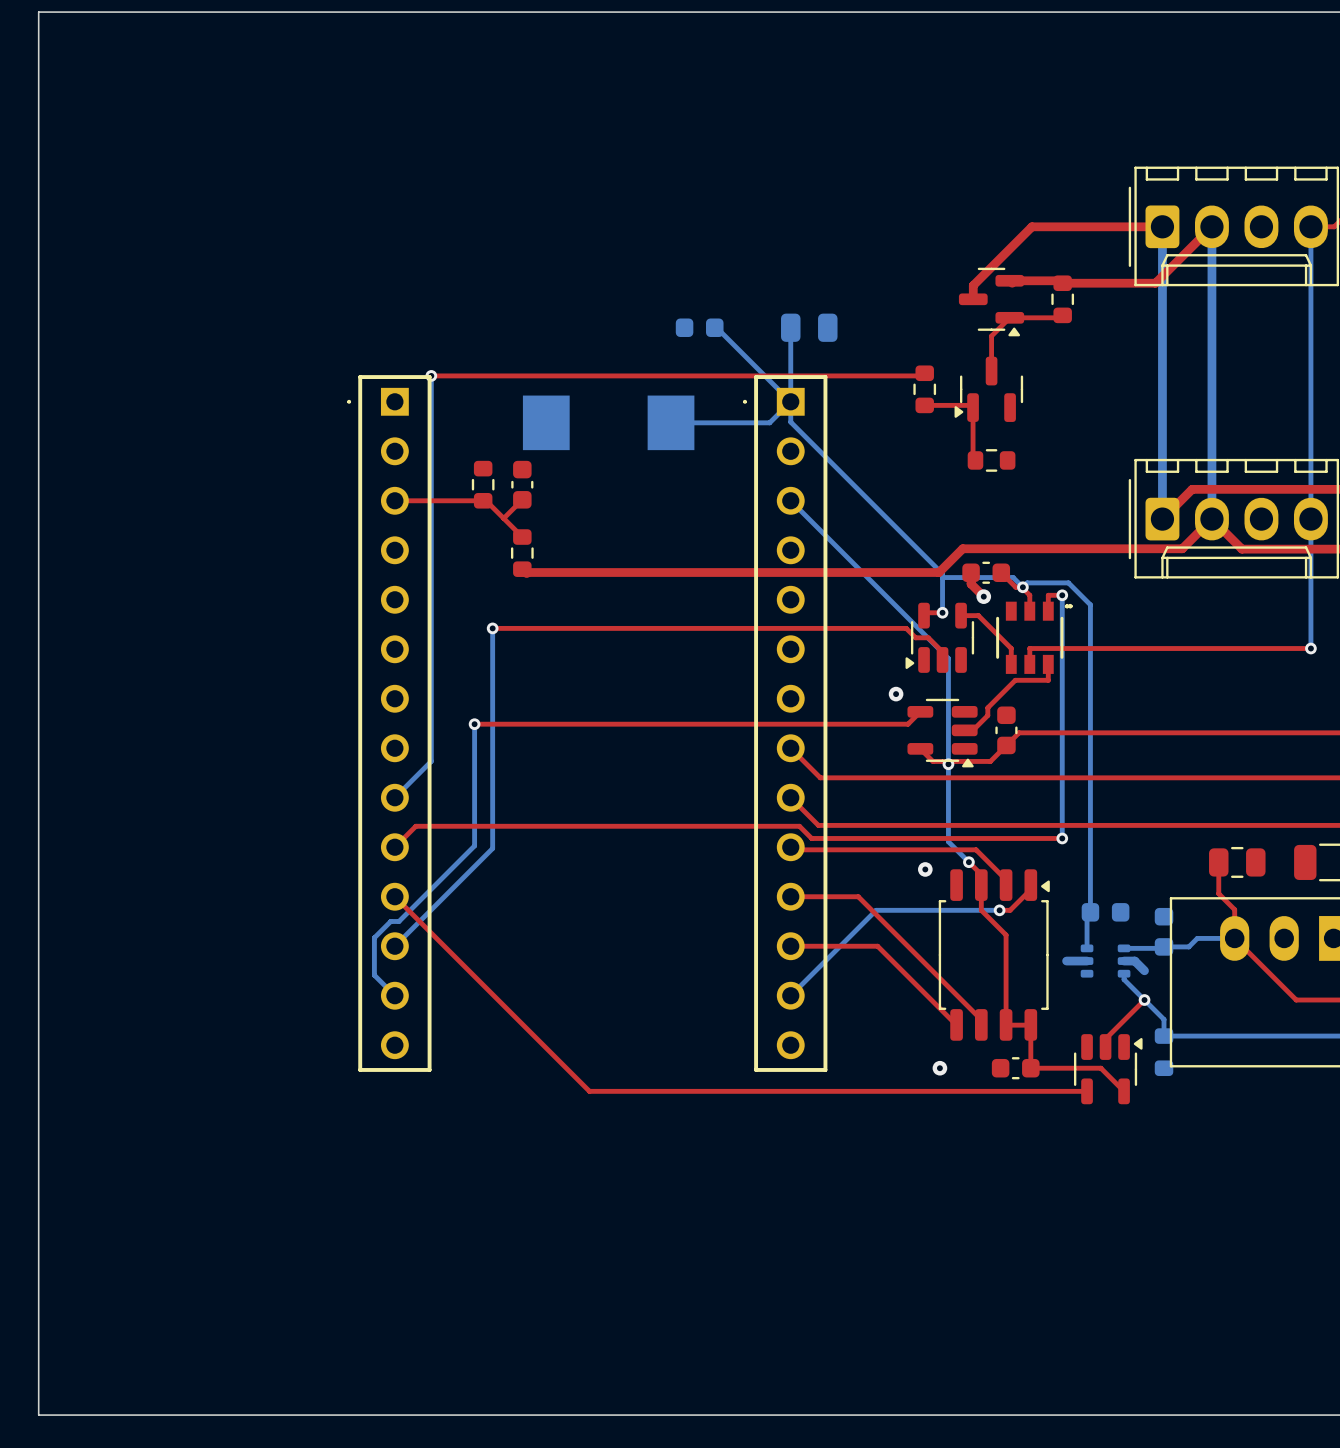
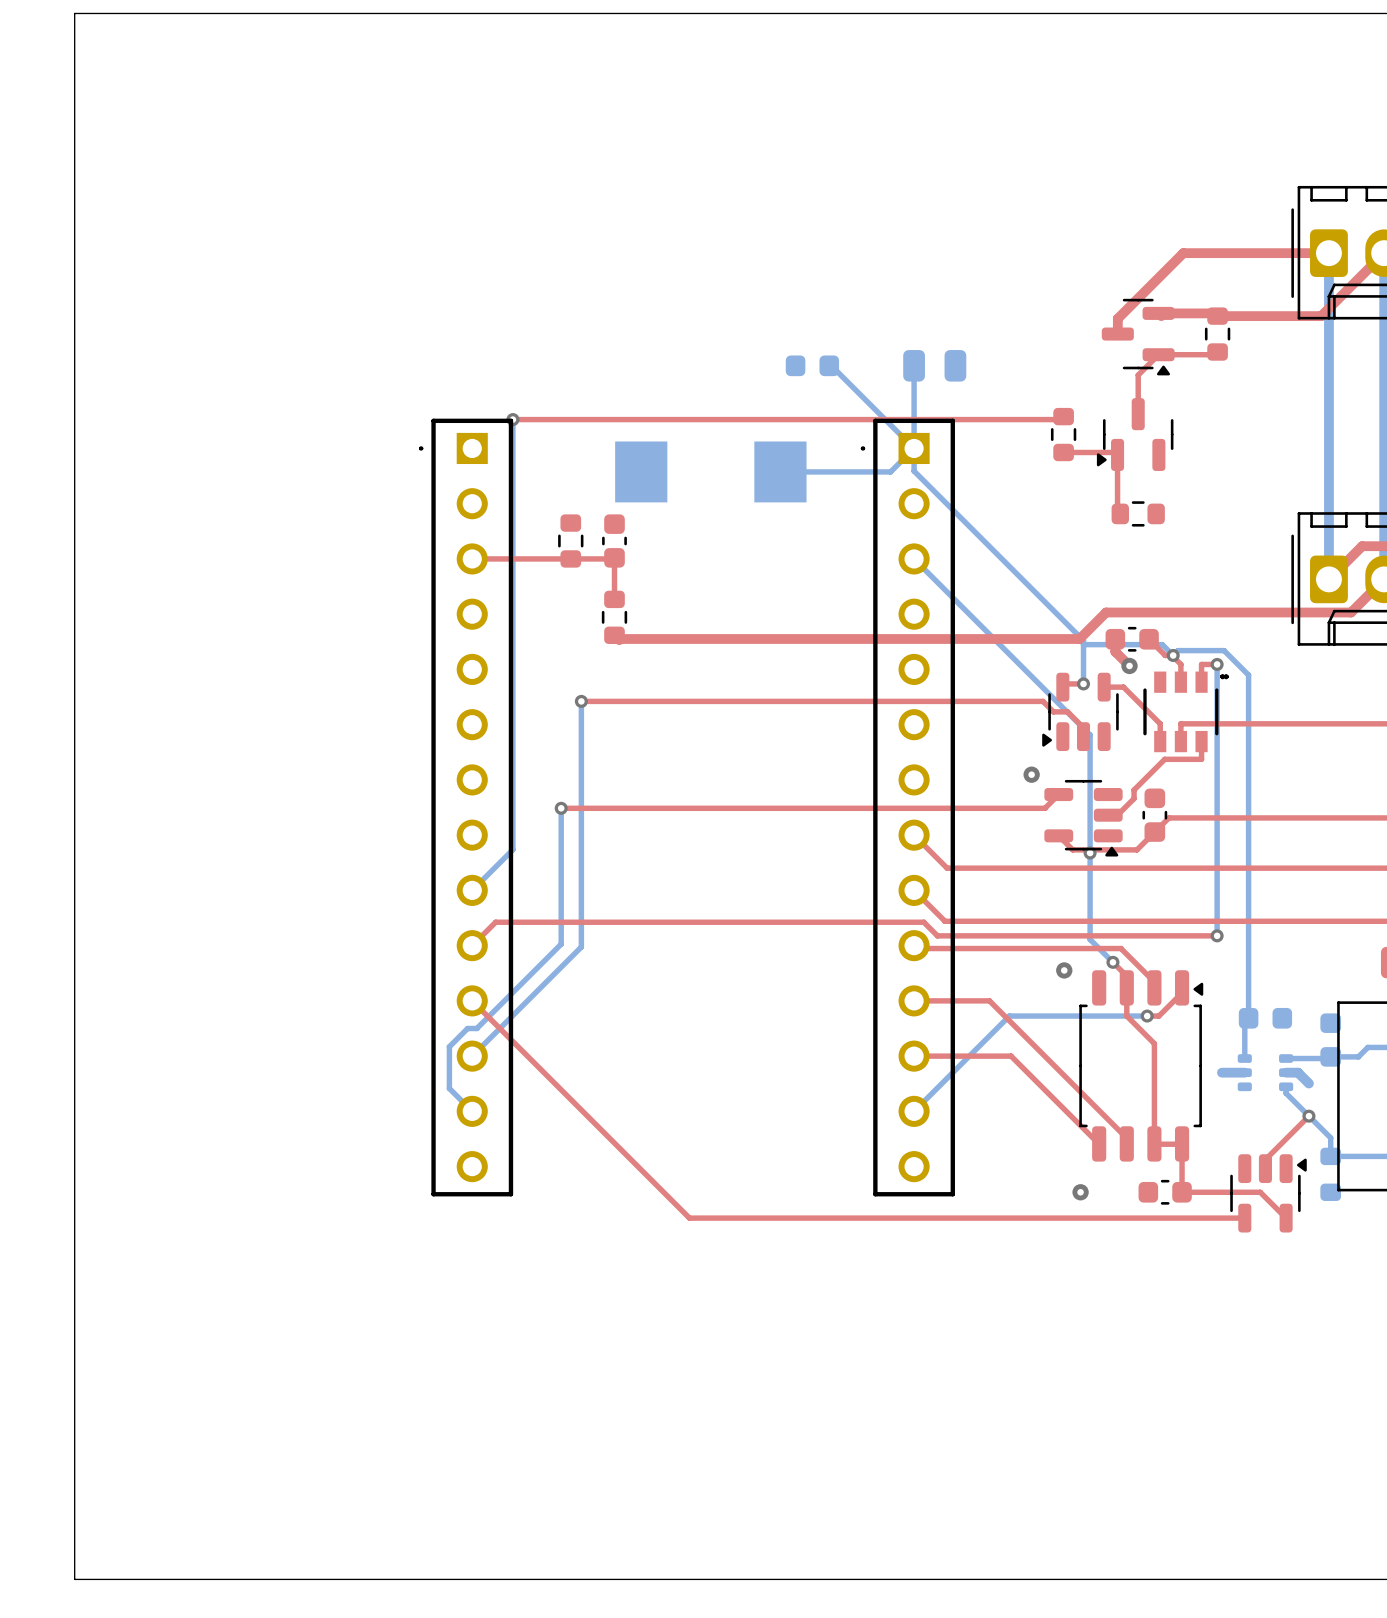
top track: none -> (613, 557) (614, 599)
top track: (522, 499) (503, 518) -> none
top track: (486, 500) (522, 537) -> (574, 558) (614, 560)

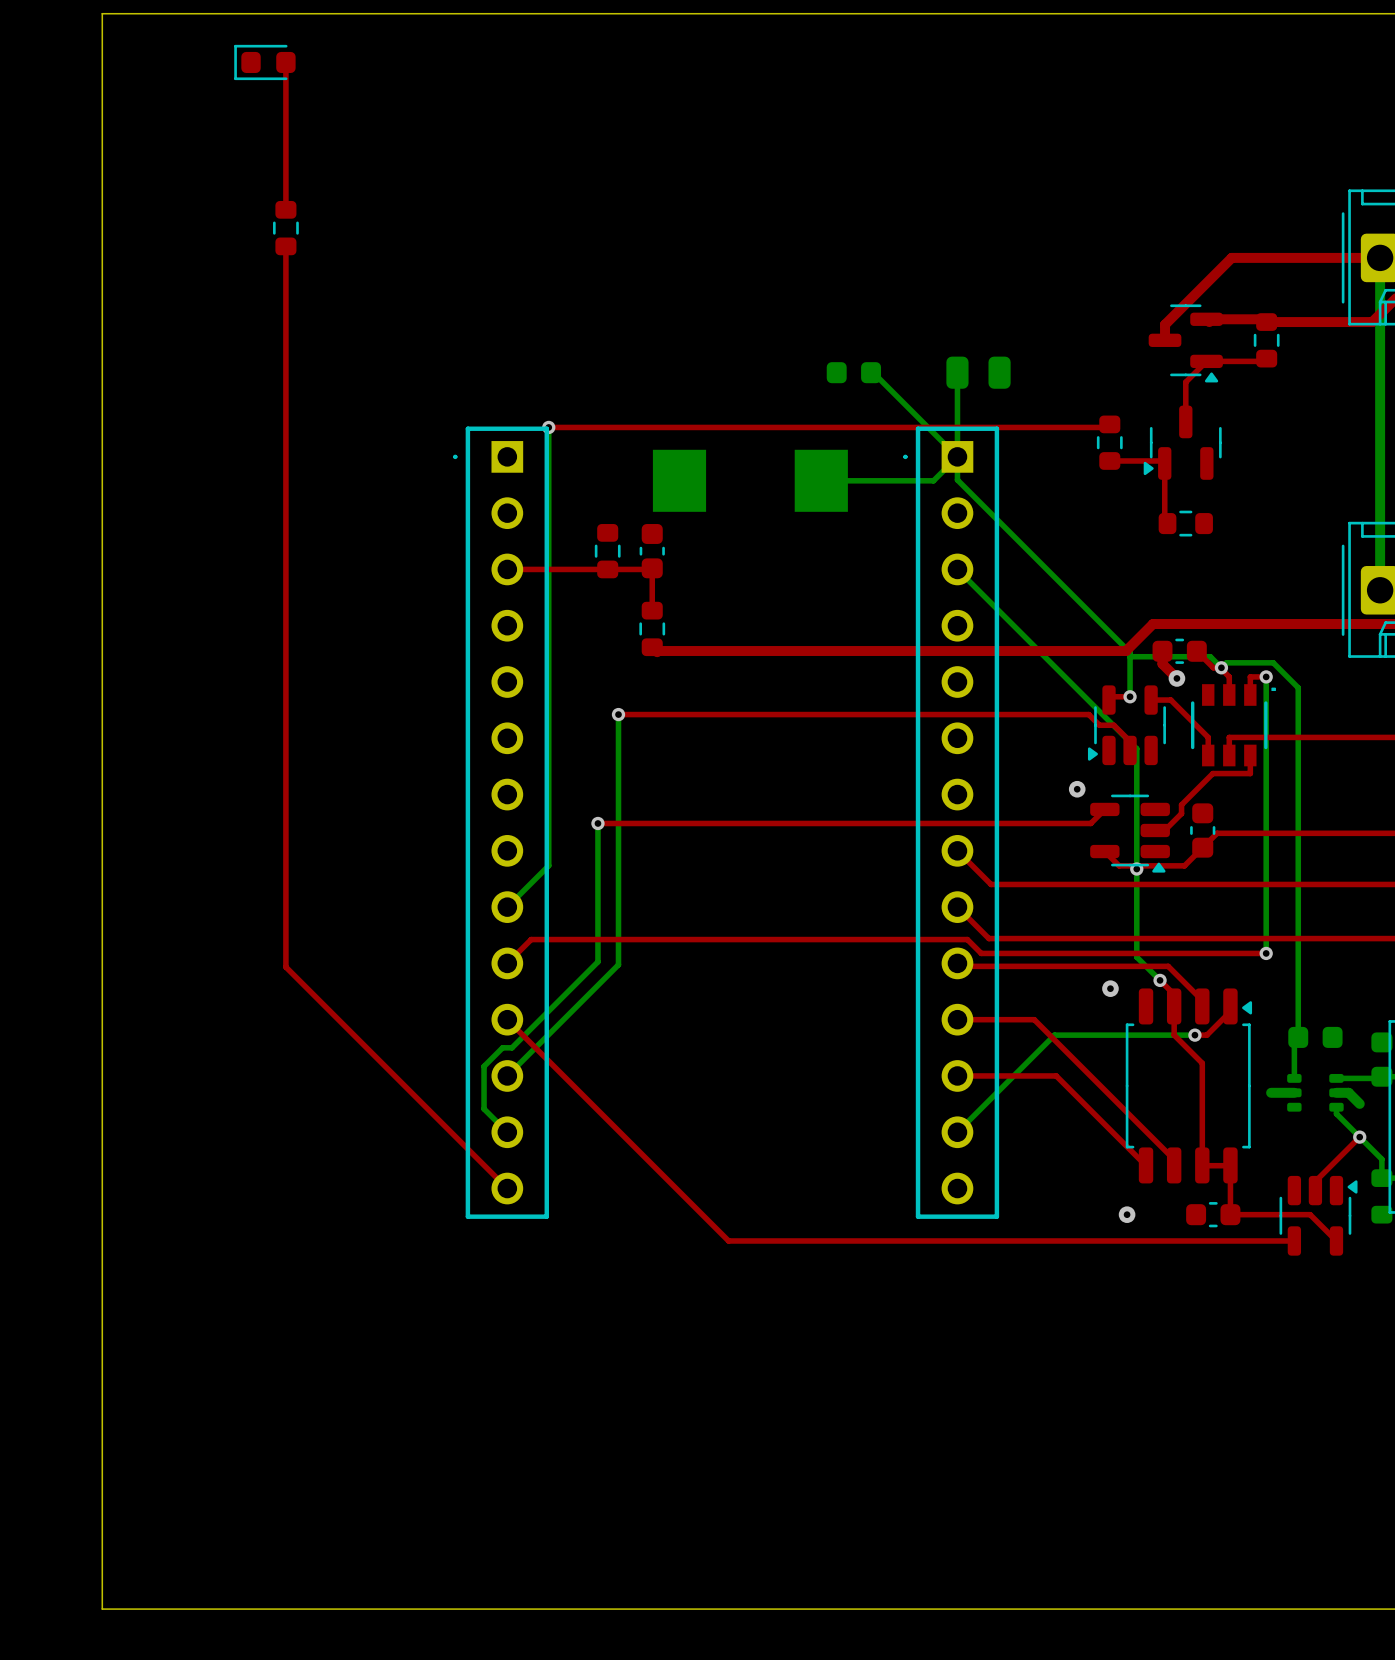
part: none -> (264, 62)
top track: none -> (285, 62) (285, 209)
part: none -> (285, 228)
top track: none -> (285, 246) (285, 967) (507, 1188)

